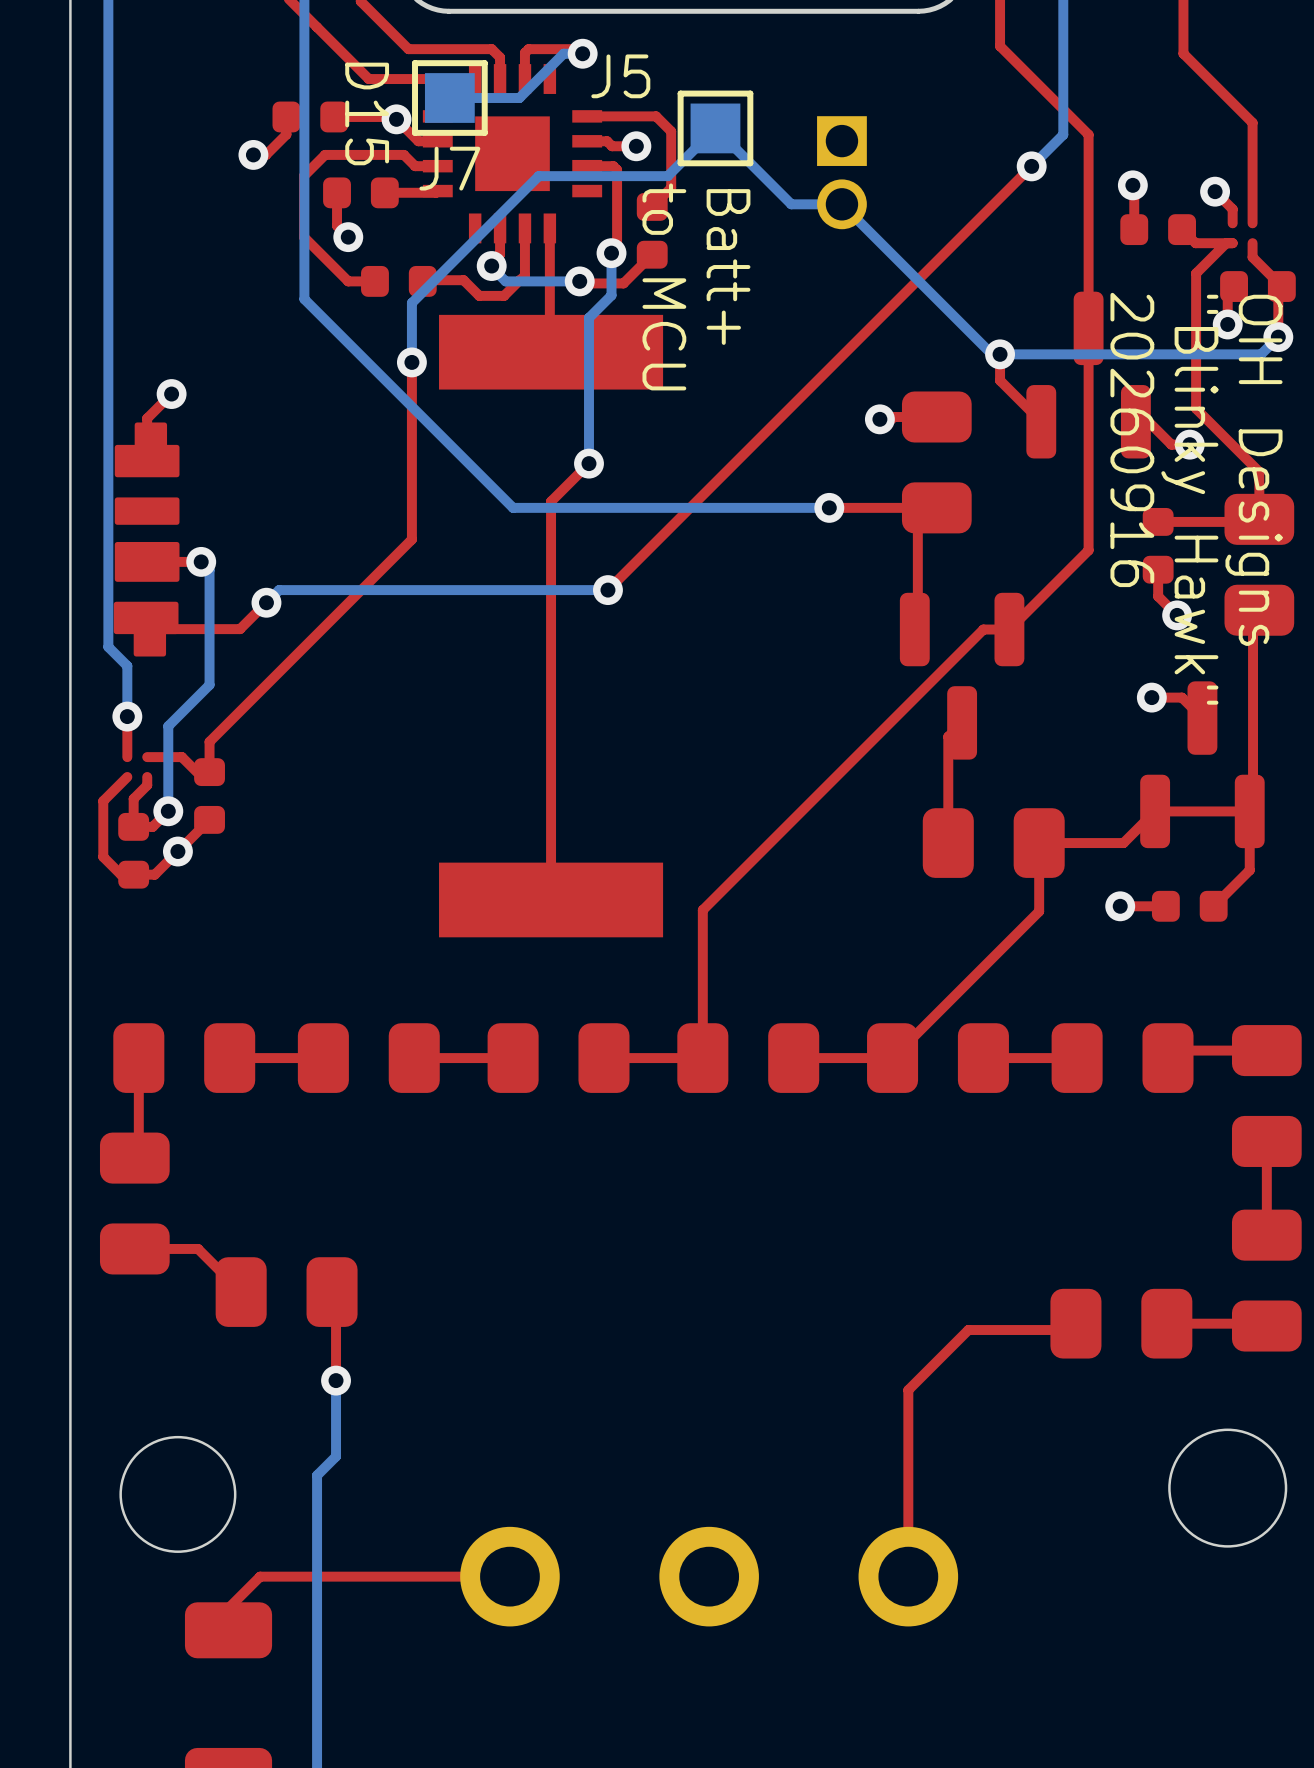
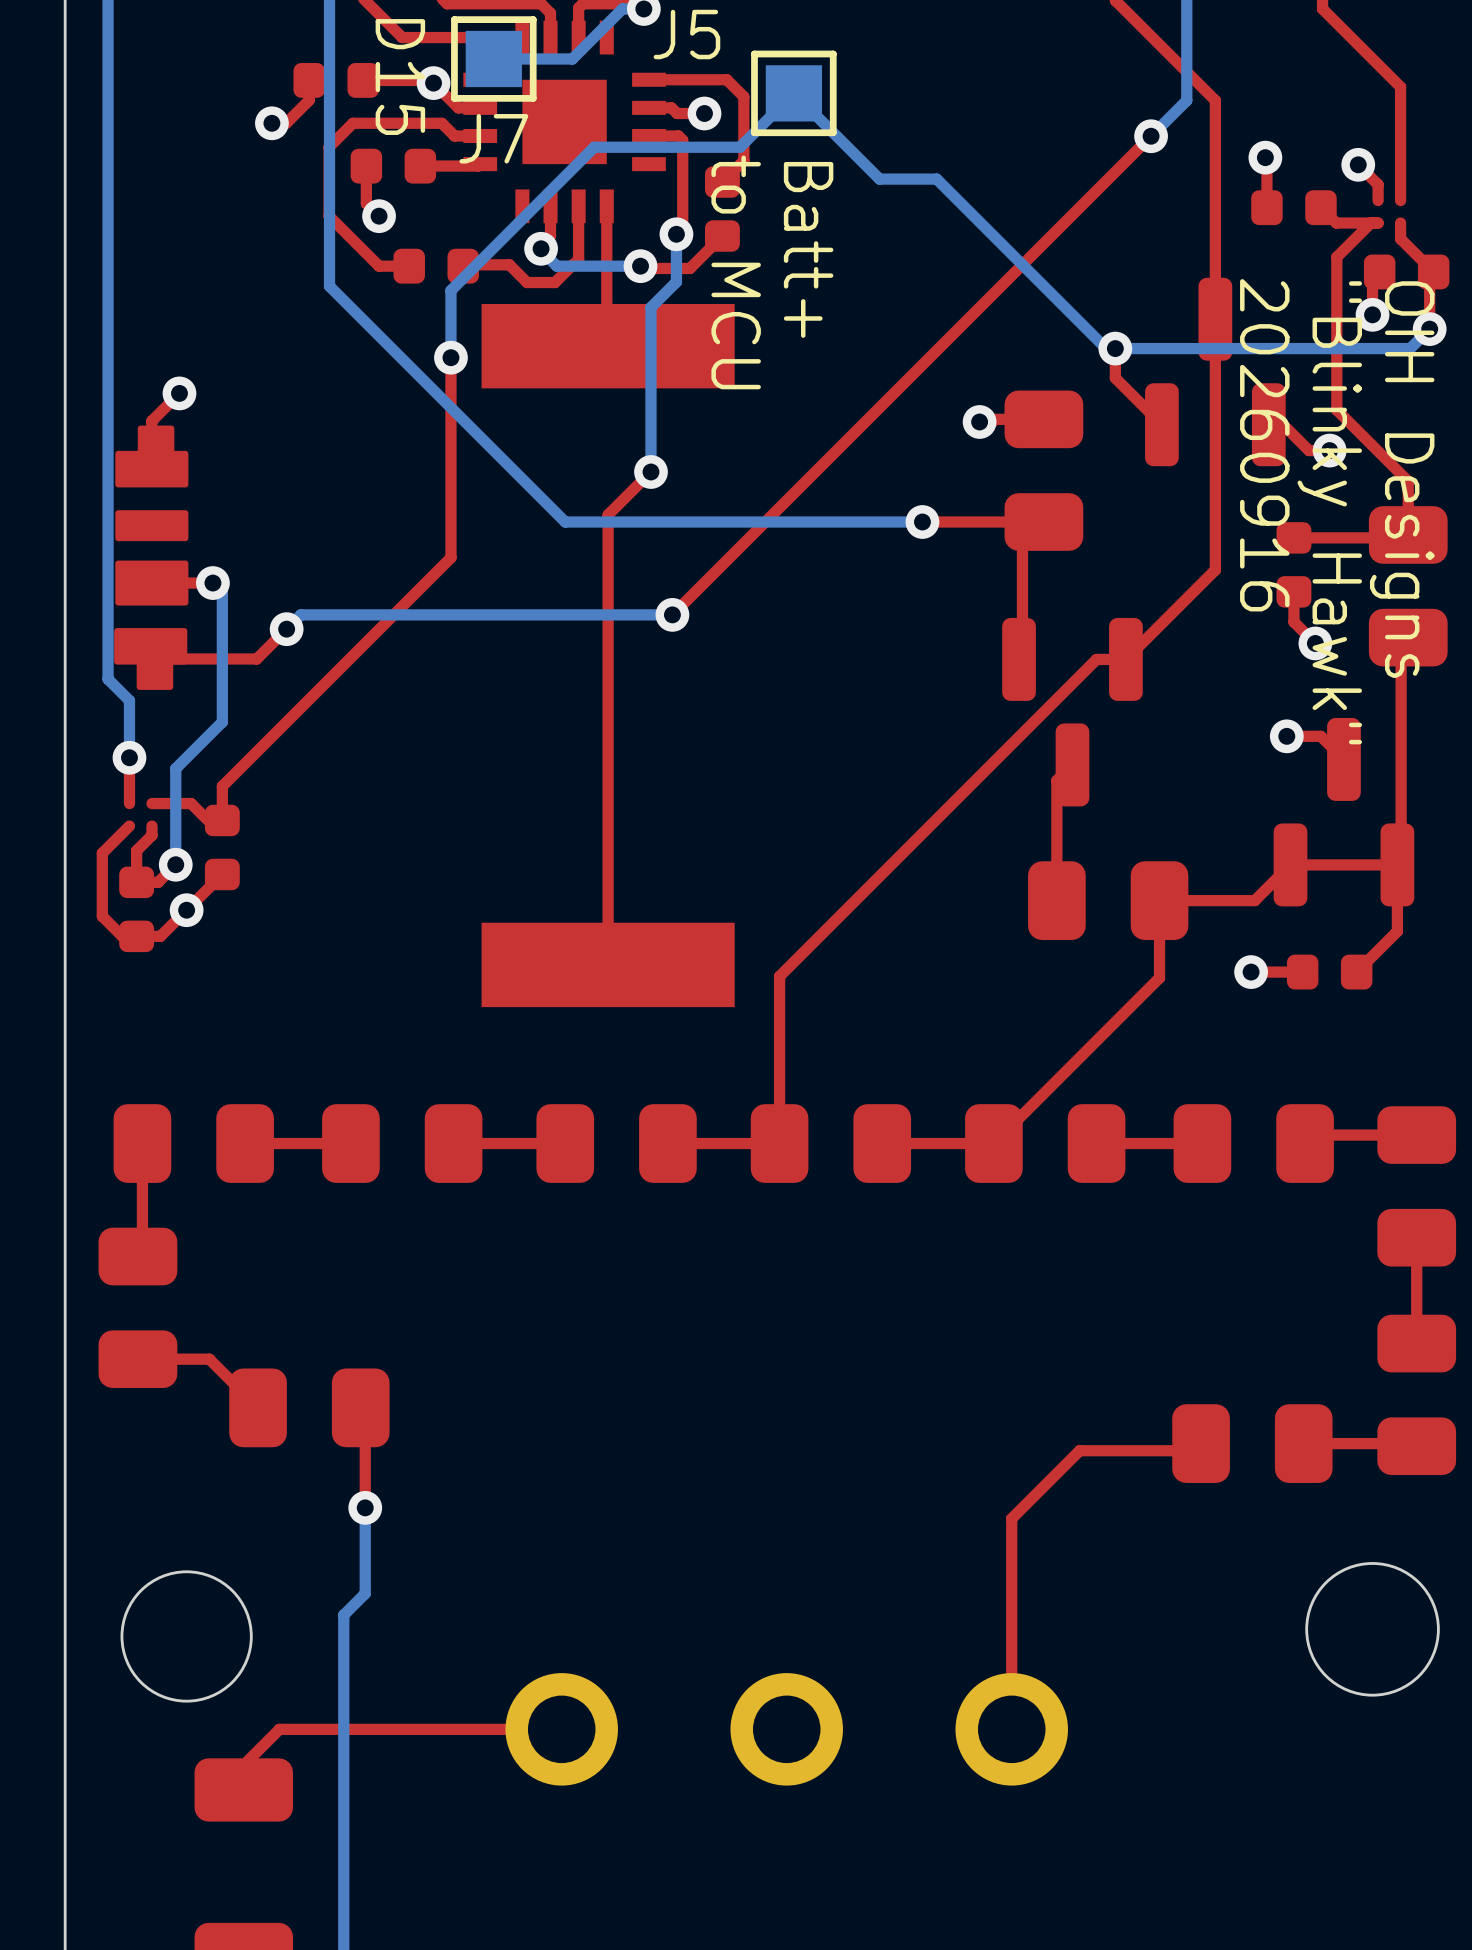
part: (841, 172) -> none

